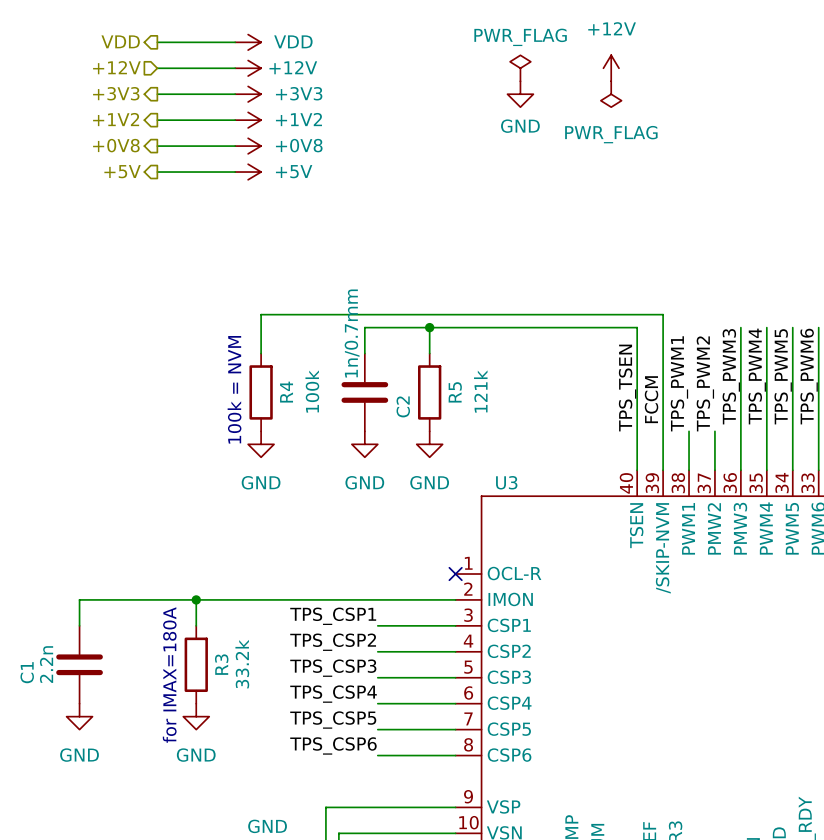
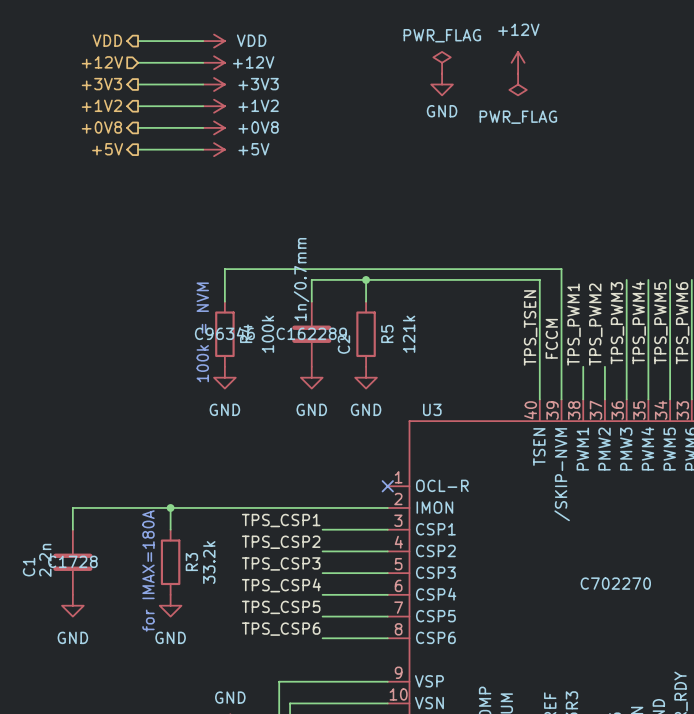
R4 text: none -> C96346 (224, 333)
C2 text: none -> C162289 (311, 333)
C1 text: none -> C1728 (72, 561)
U3 text: none -> C702270 (615, 583)

